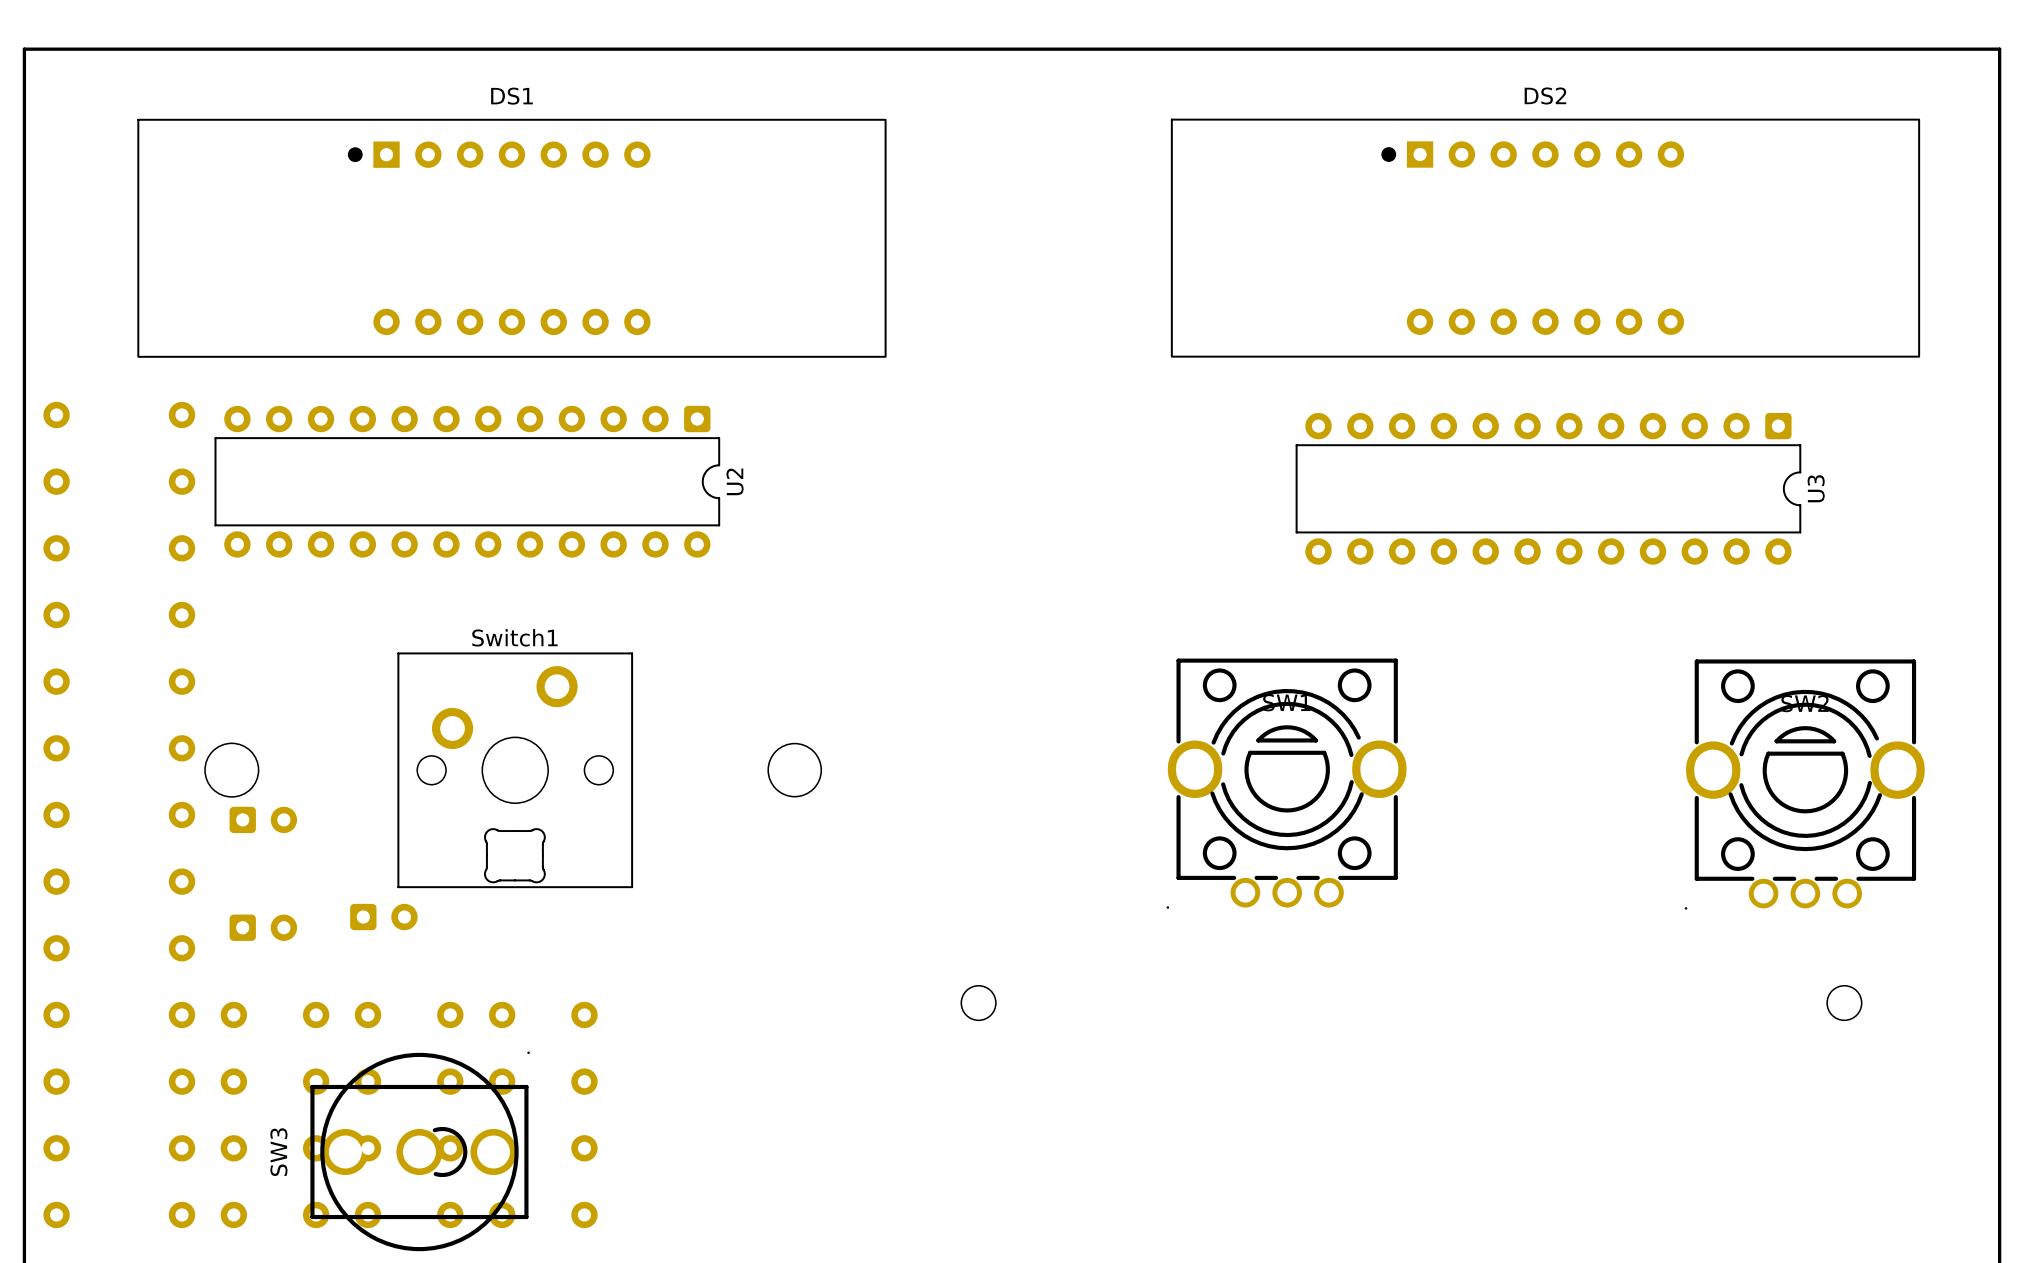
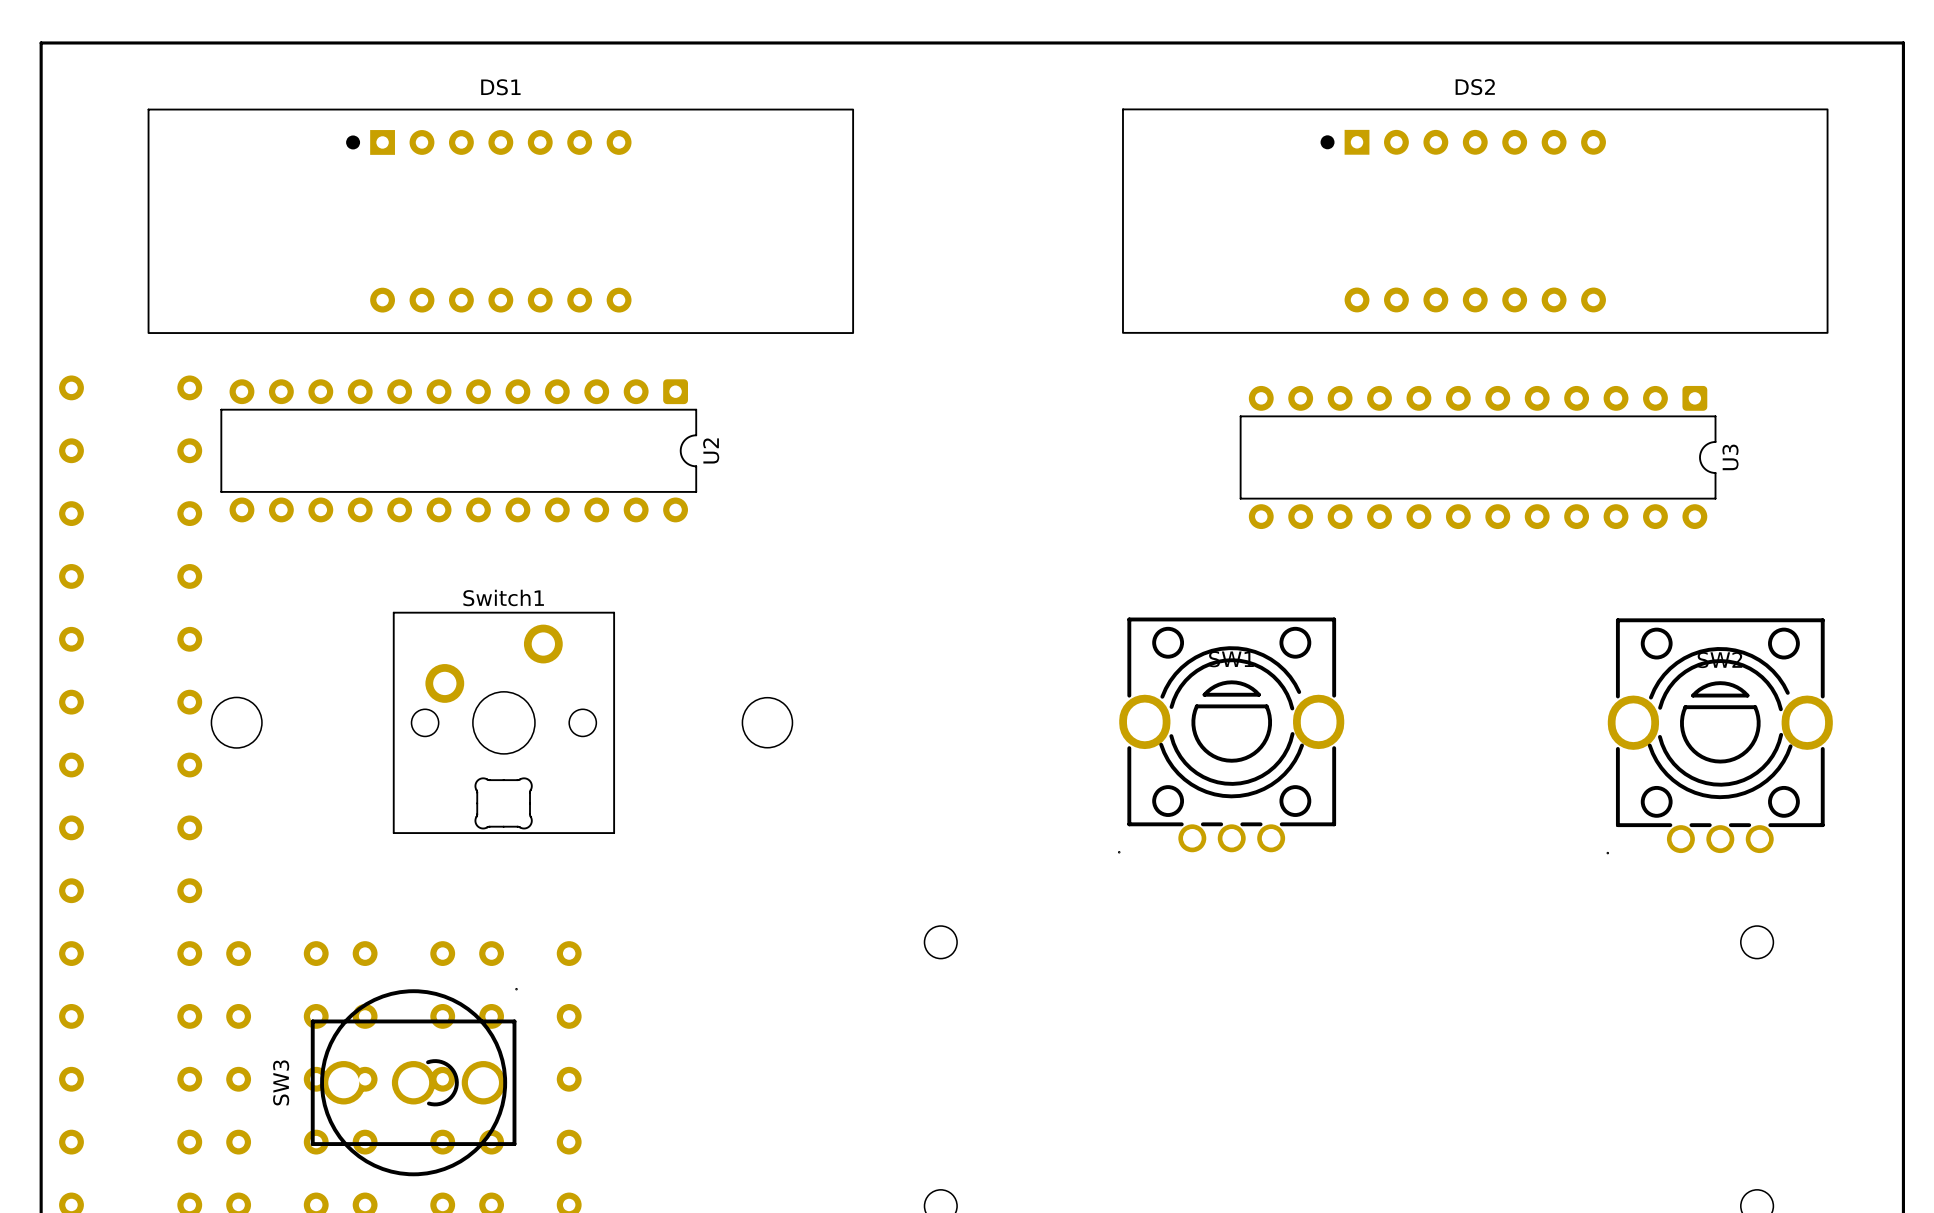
part: (263, 819) -> none
part: (383, 917) -> none
part: (263, 927) -> none

